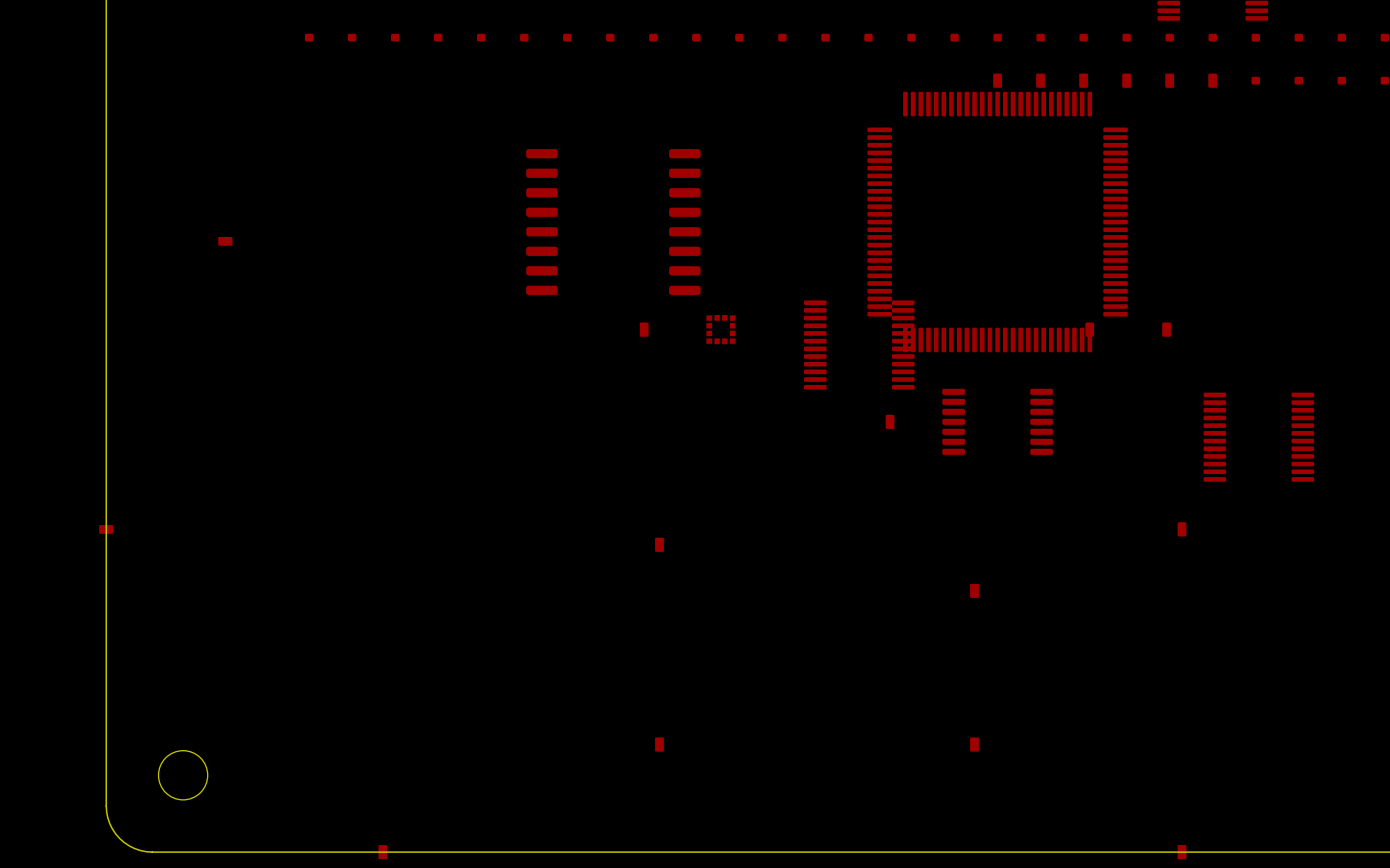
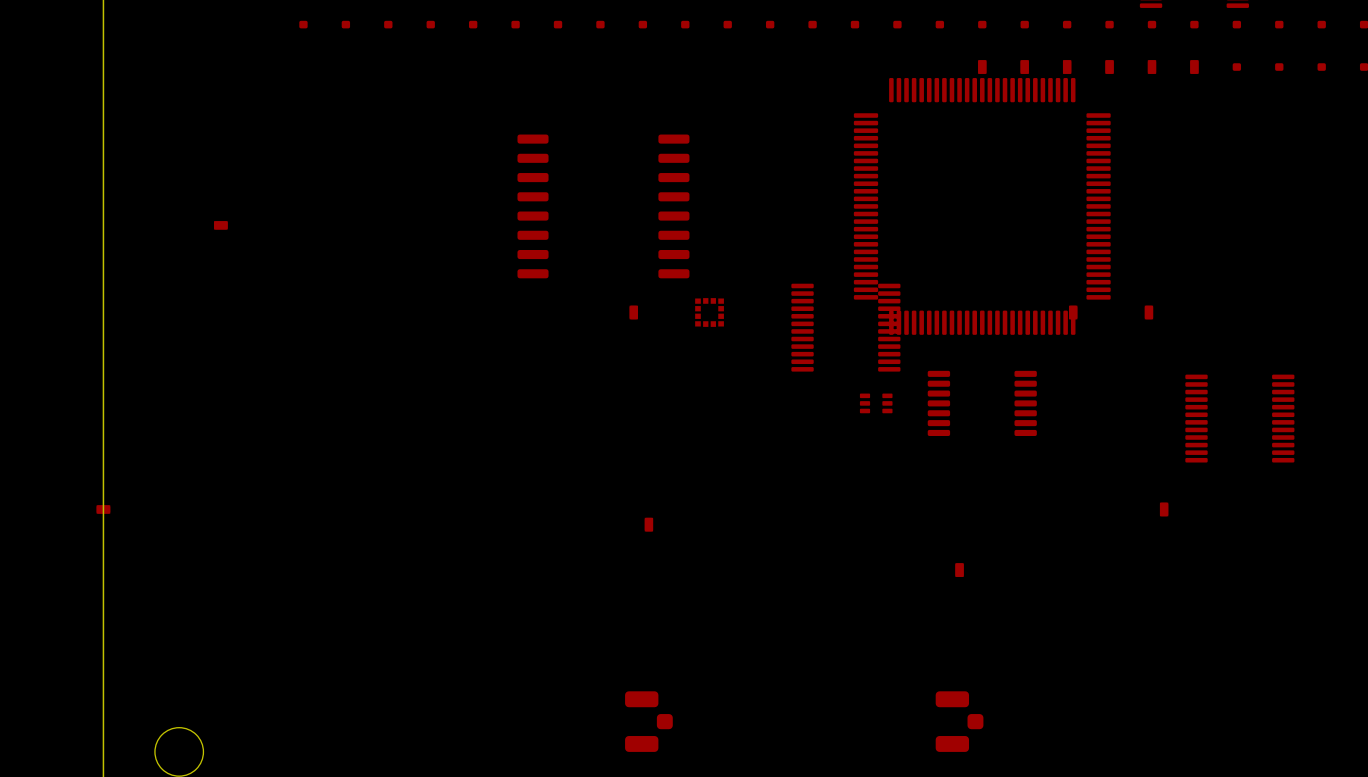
part footprint: [885, 414, 895, 429] -> [859, 393, 893, 414]
part footprint: [655, 737, 664, 752] -> [625, 691, 673, 752]
part footprint: [970, 737, 979, 752] -> [935, 691, 984, 752]

